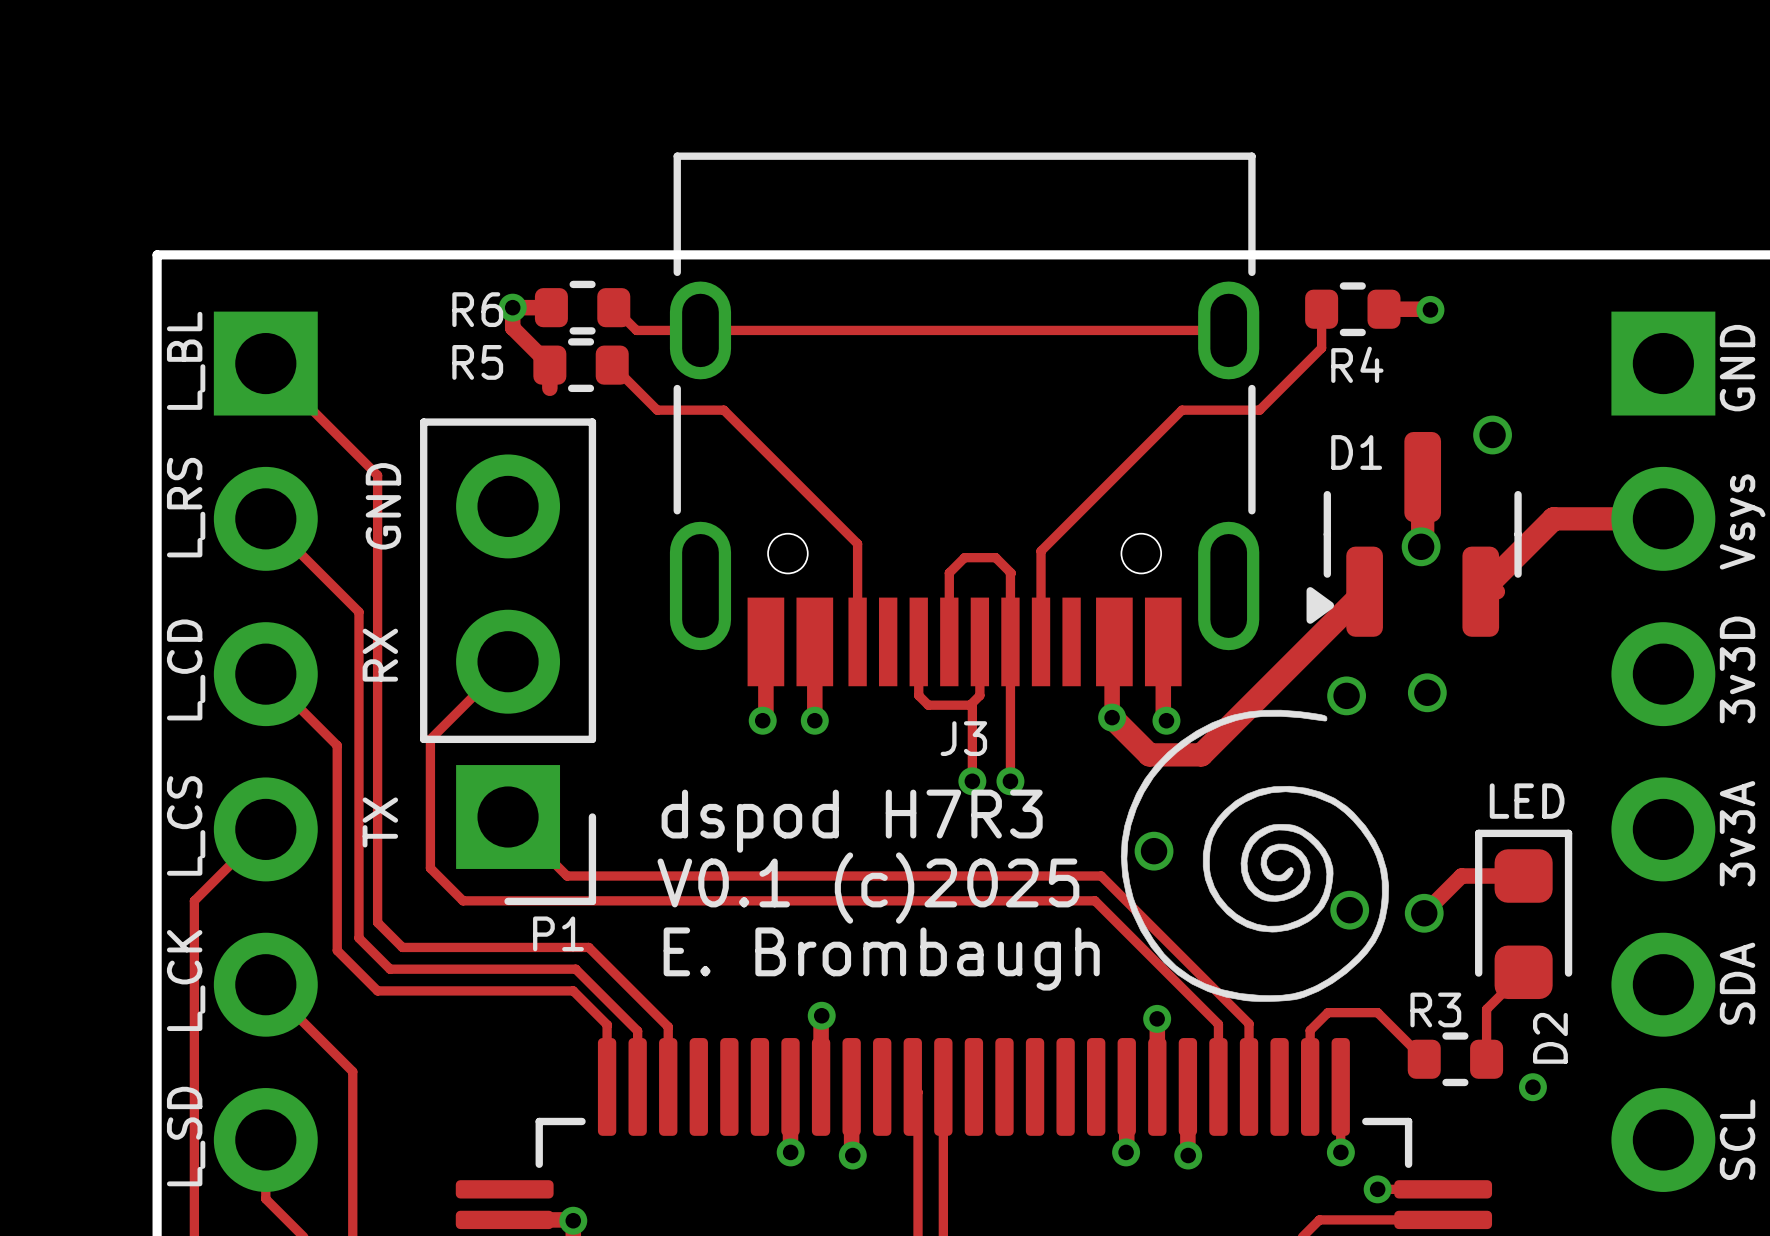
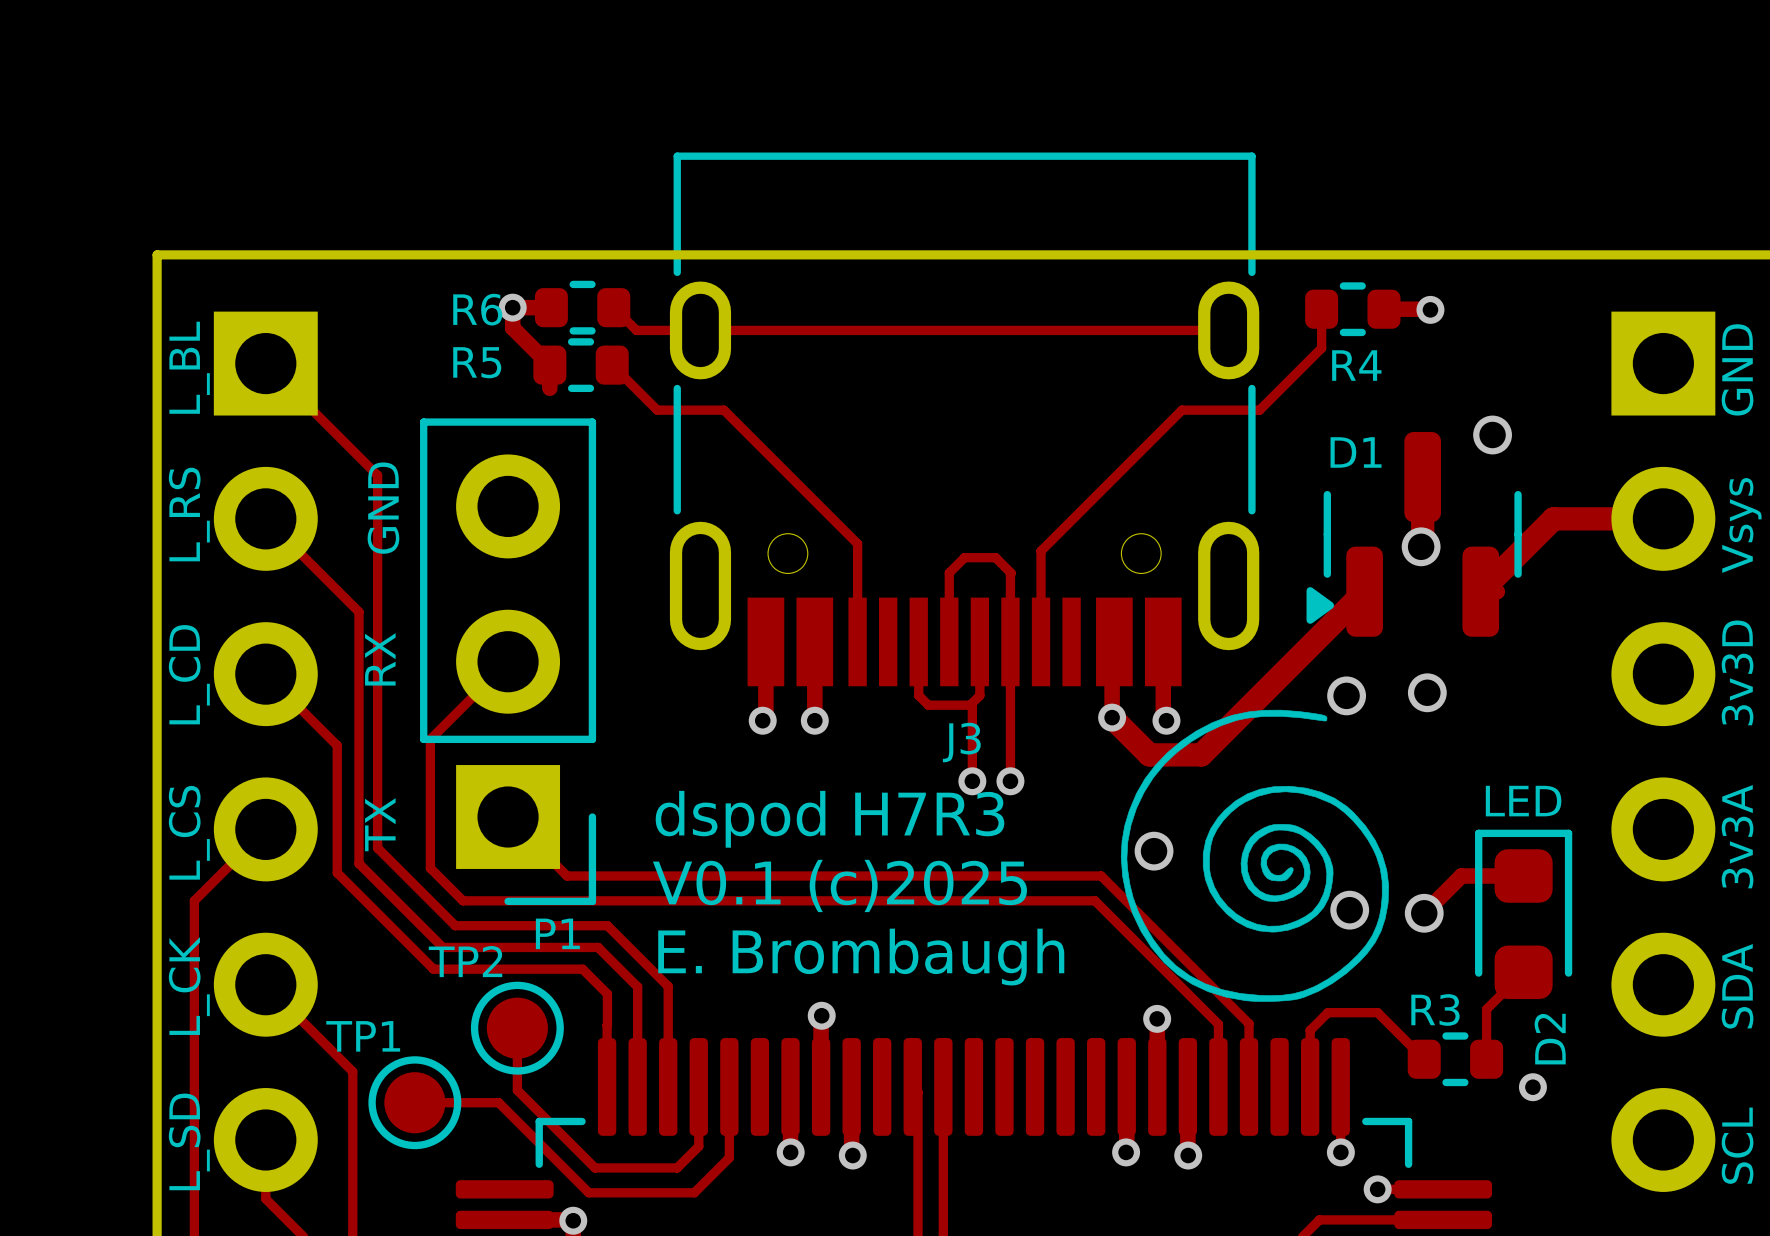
track: (377, 848) (377, 922) (402, 947) (442, 947) -> none
track: (358, 863) (358, 938) (390, 969) (433, 969) -> (358, 863) (442, 947)
track: (337, 872) (337, 950) (377, 990) (573, 990) (607, 1025) -> (337, 872) (433, 969)
track: (588, 947) (668, 1026) -> (377, 848) (455, 925) (607, 925) (668, 986) (668, 1026)
track: (575, 969) (637, 1031) -> (588, 947) (598, 947) (637, 986) (637, 1031)
track: none -> (575, 969) (582, 969) (607, 994) (607, 1025)
track: none -> (517, 1028) (517, 1090) (595, 1167) (677, 1167) (698, 1146) (698, 1086)
TP2: none -> (517, 1028)
track: none -> (729, 1086) (729, 1157) (694, 1192) (588, 1192) (498, 1102) (414, 1102)
TP1: none -> (414, 1102)

